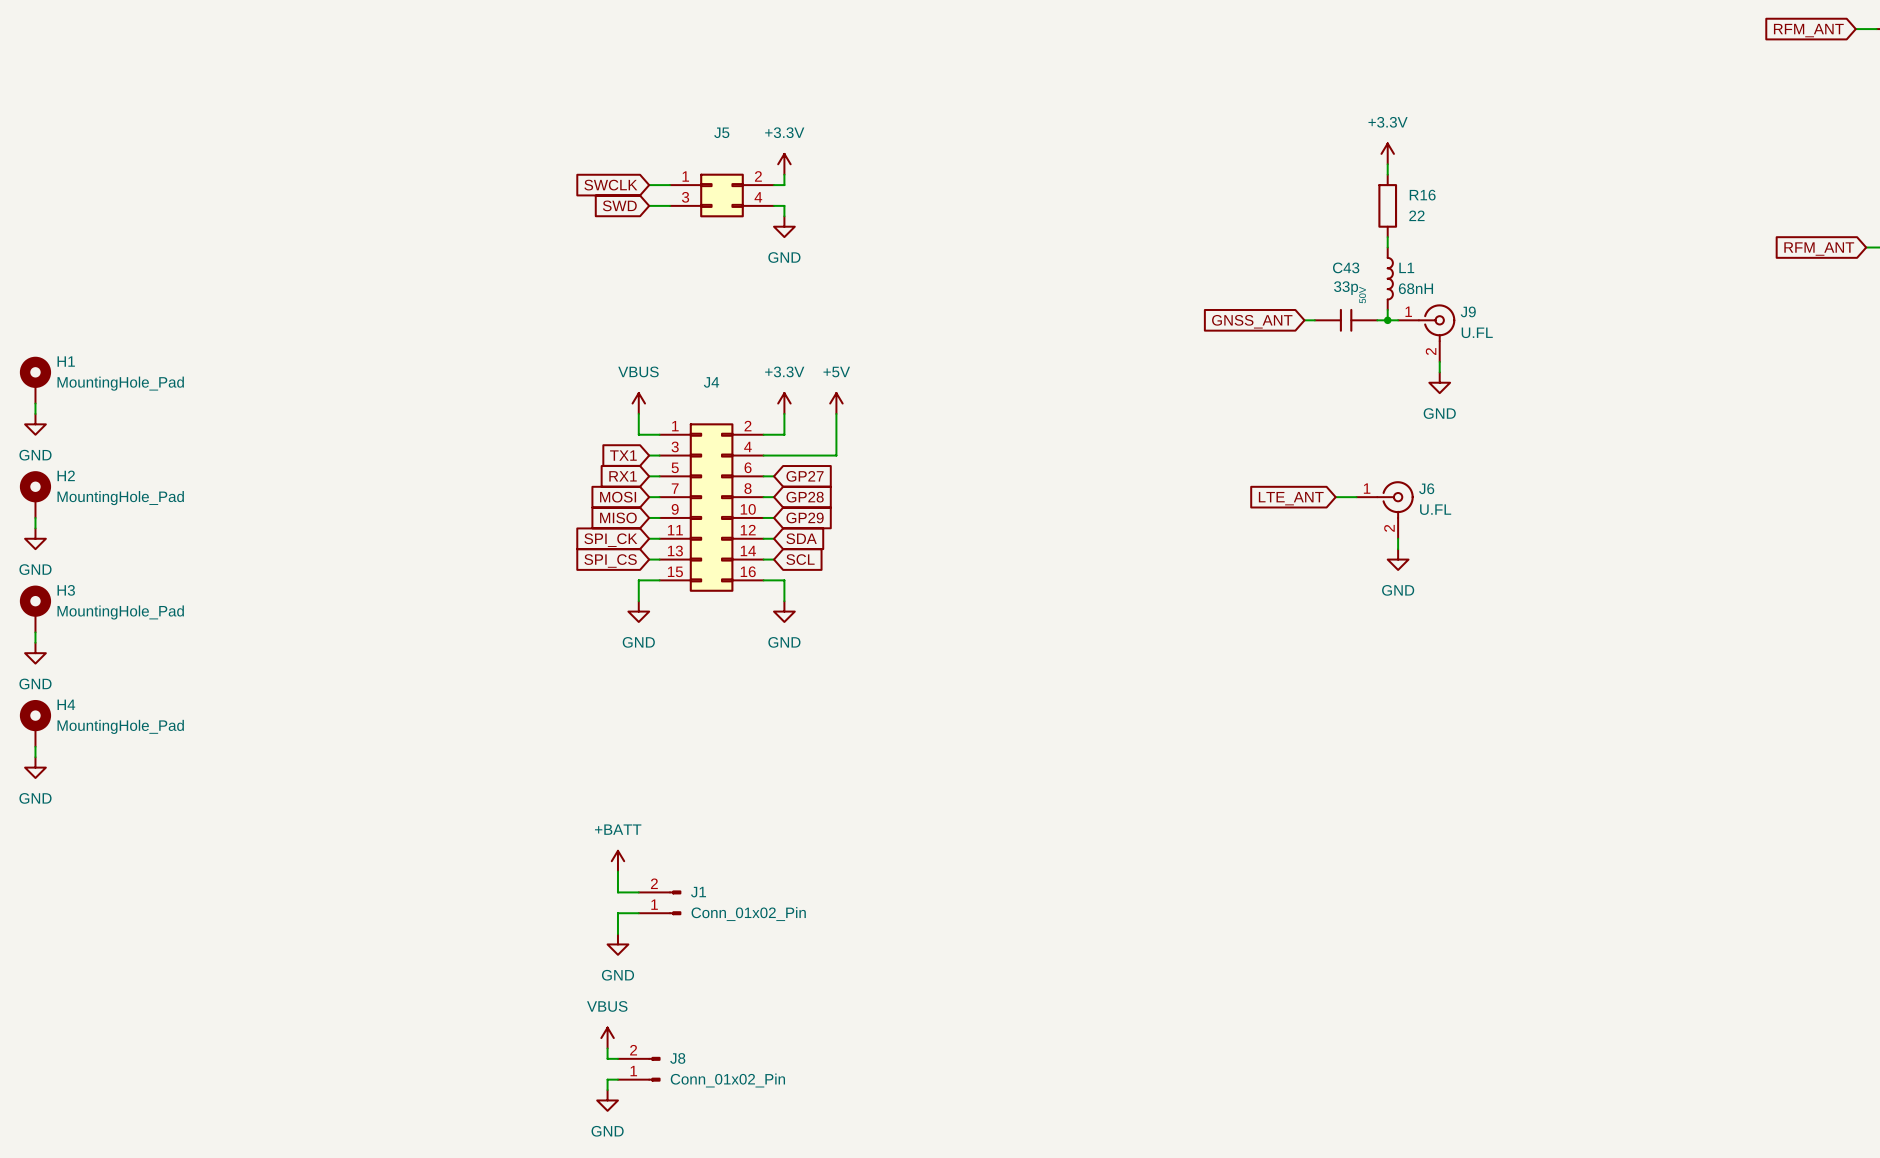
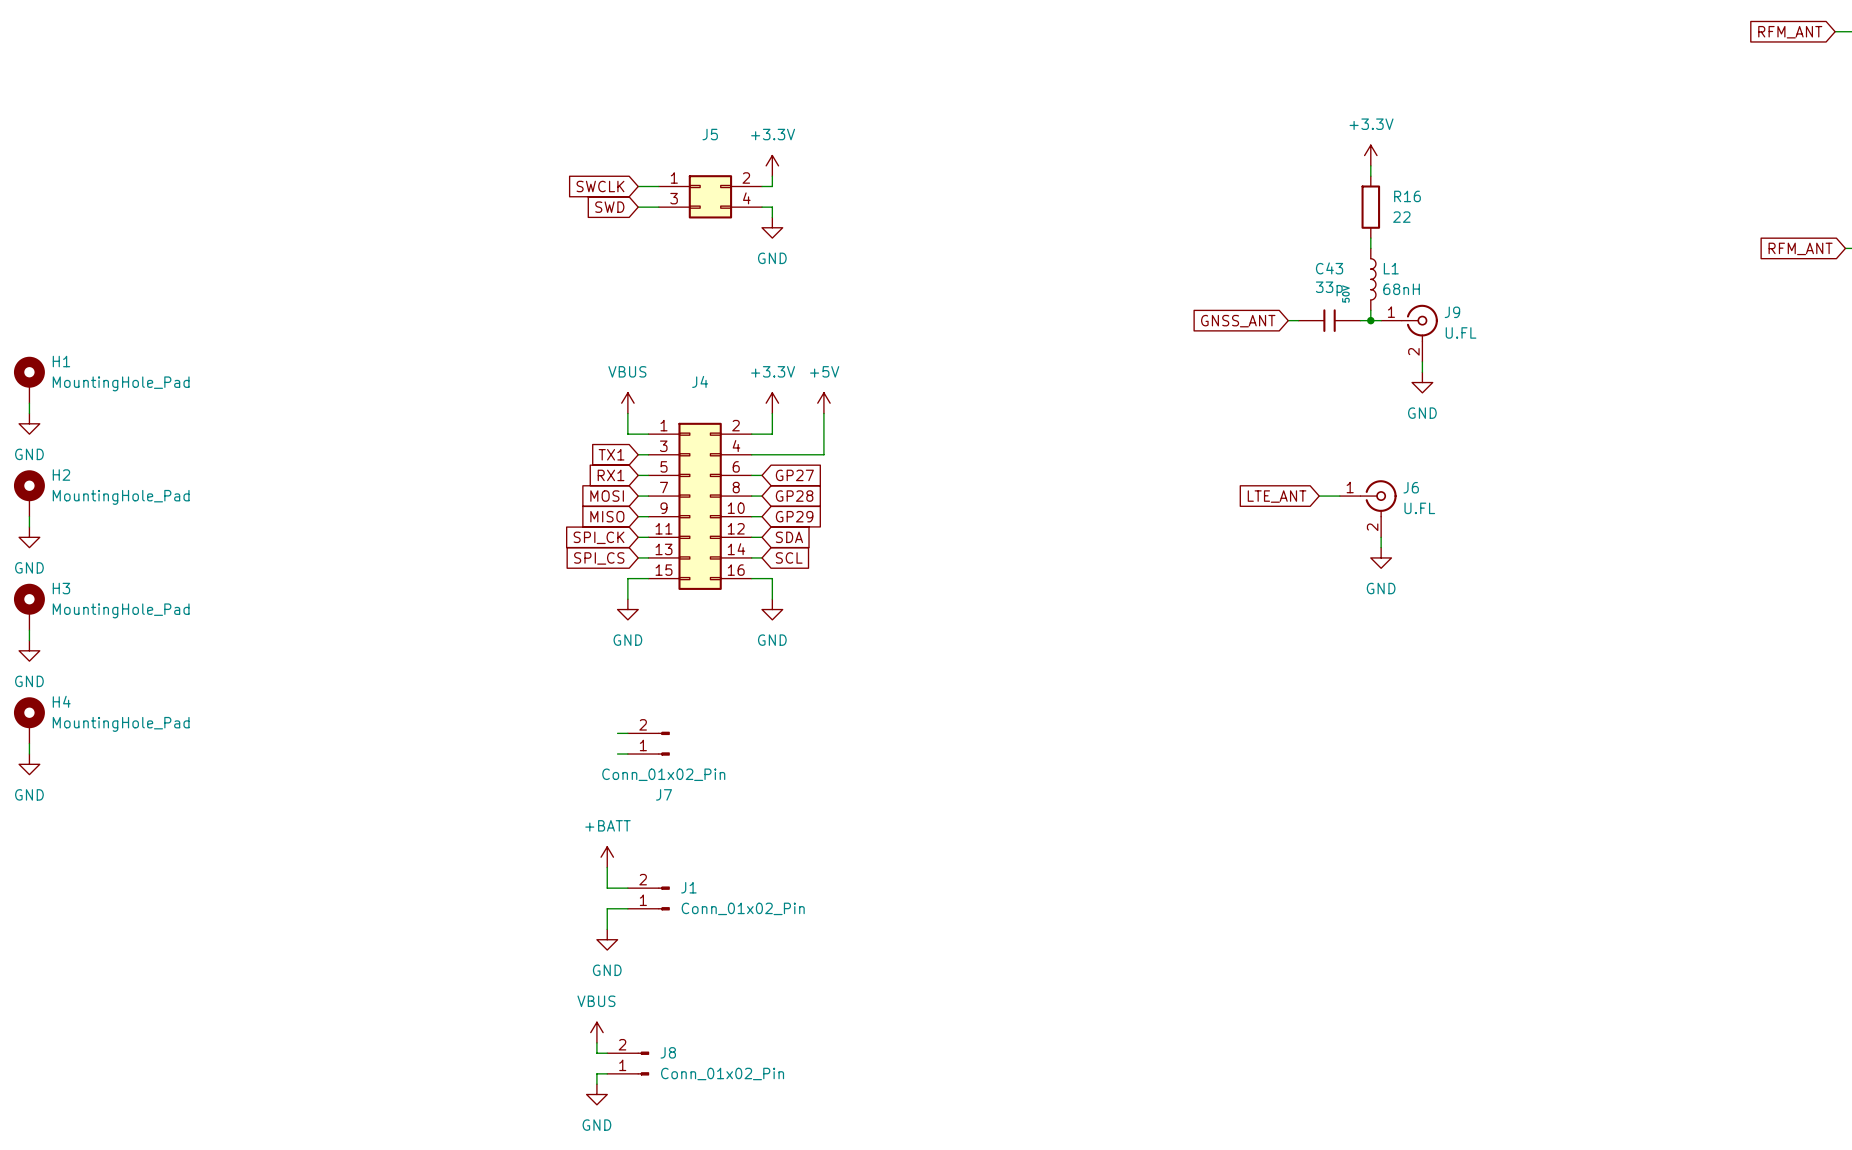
wire: none -> (617, 733) (627, 733)
J7: none -> Conn_01x02_Pin (648, 743)
wire: none -> (617, 754) (627, 754)

